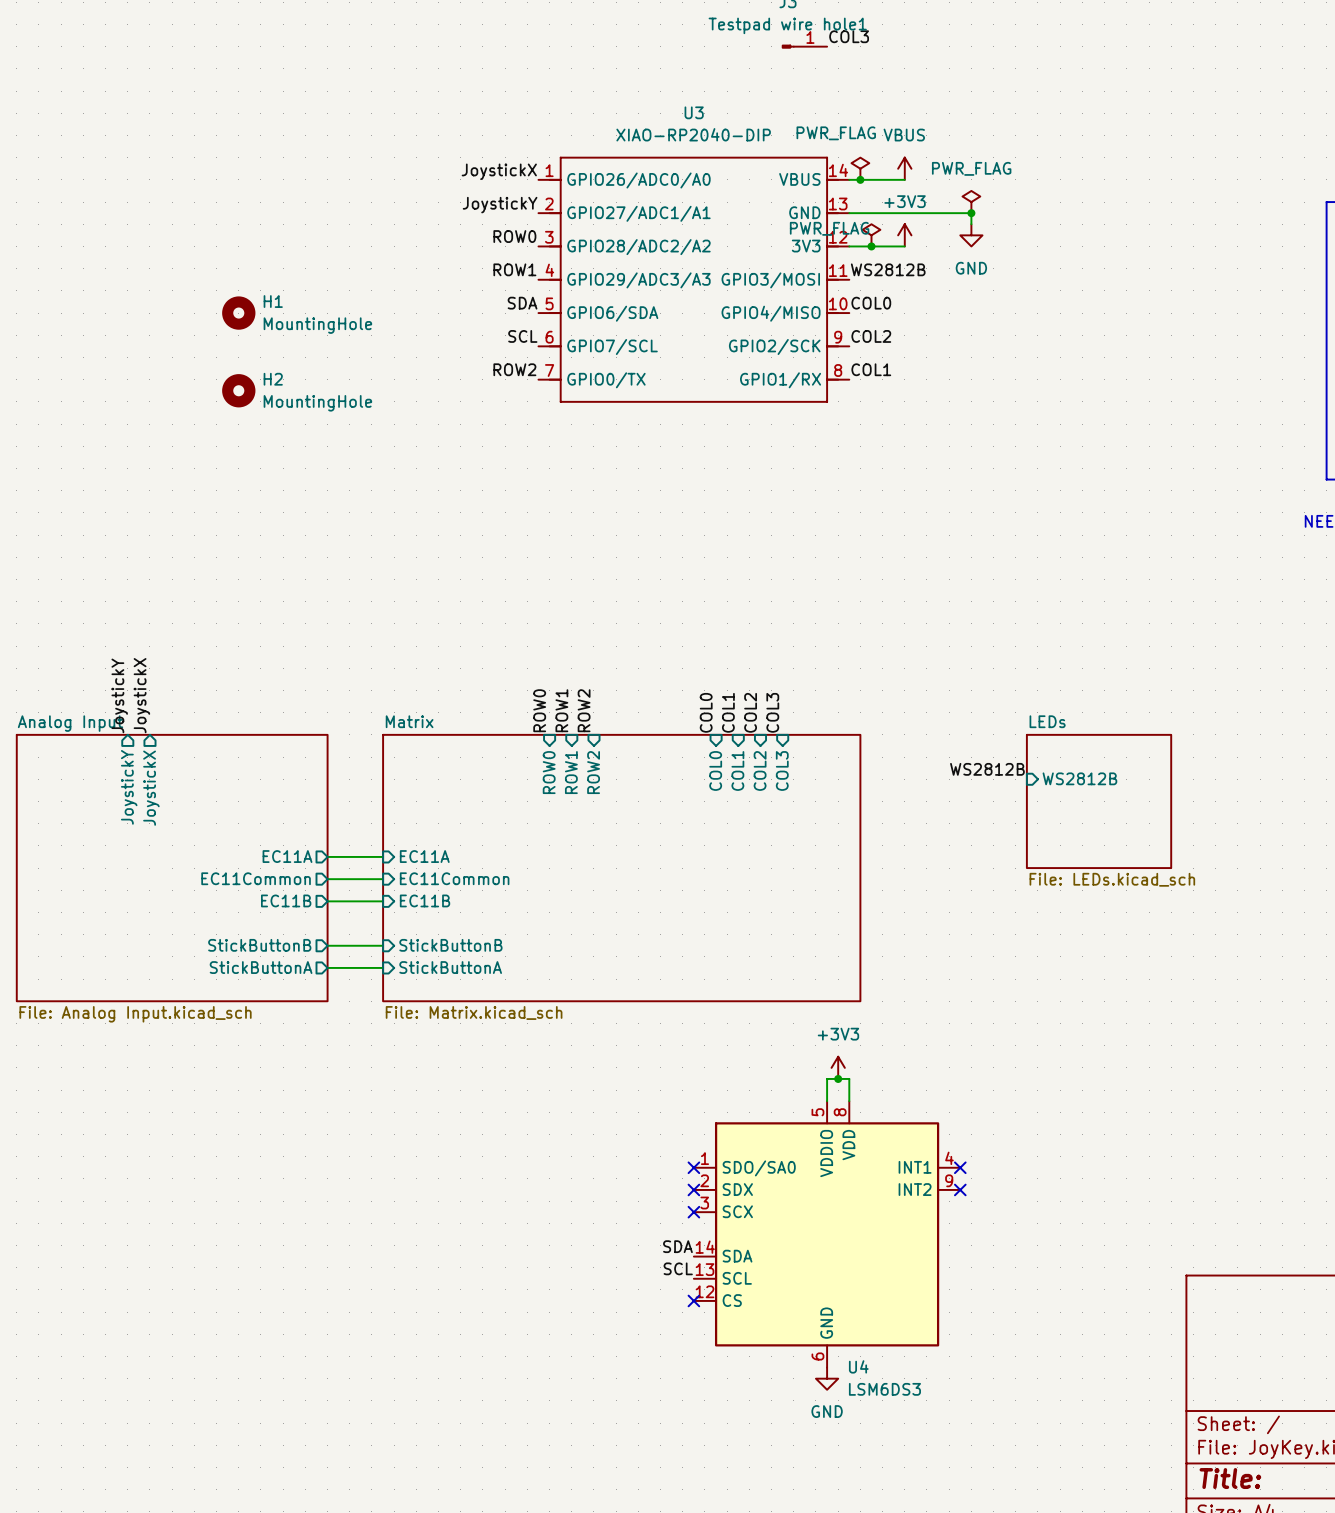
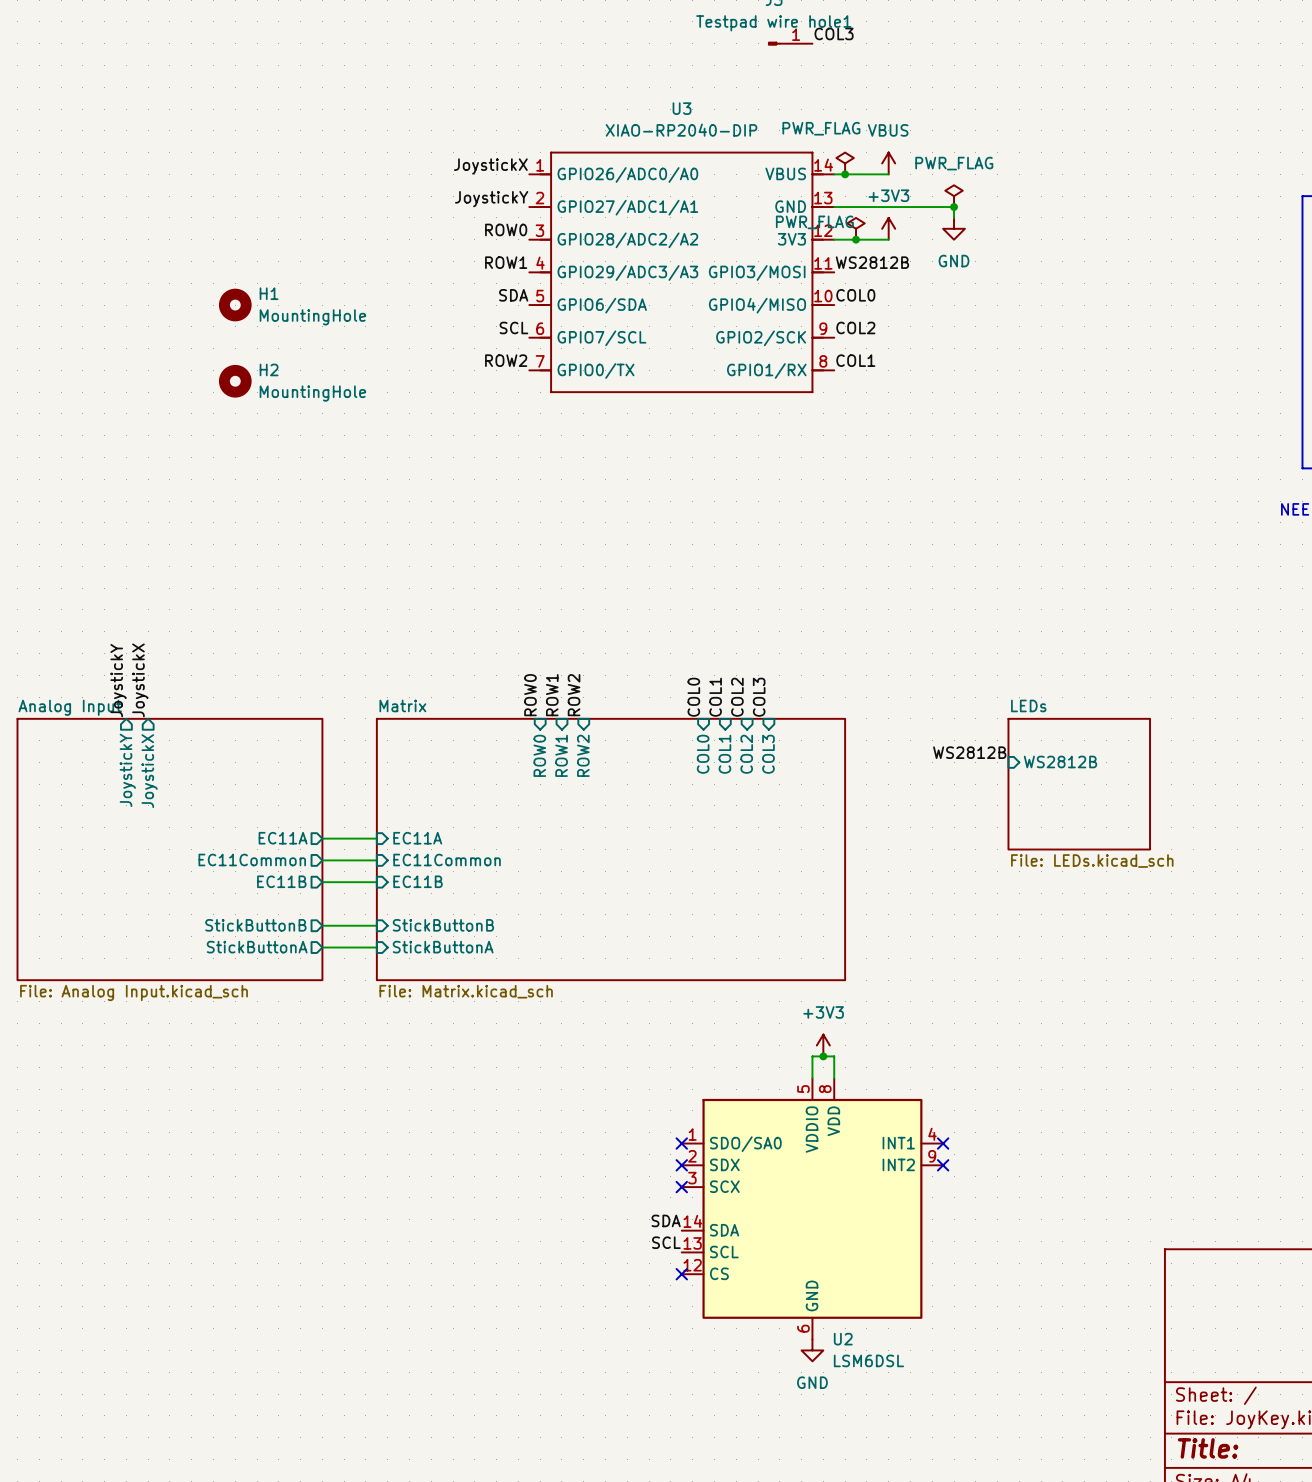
U4 name: U4 (858, 1366) -> U2 (843, 1339)
U4 value: LSM6DS3 (884, 1389) -> LSM6DSL (868, 1360)

